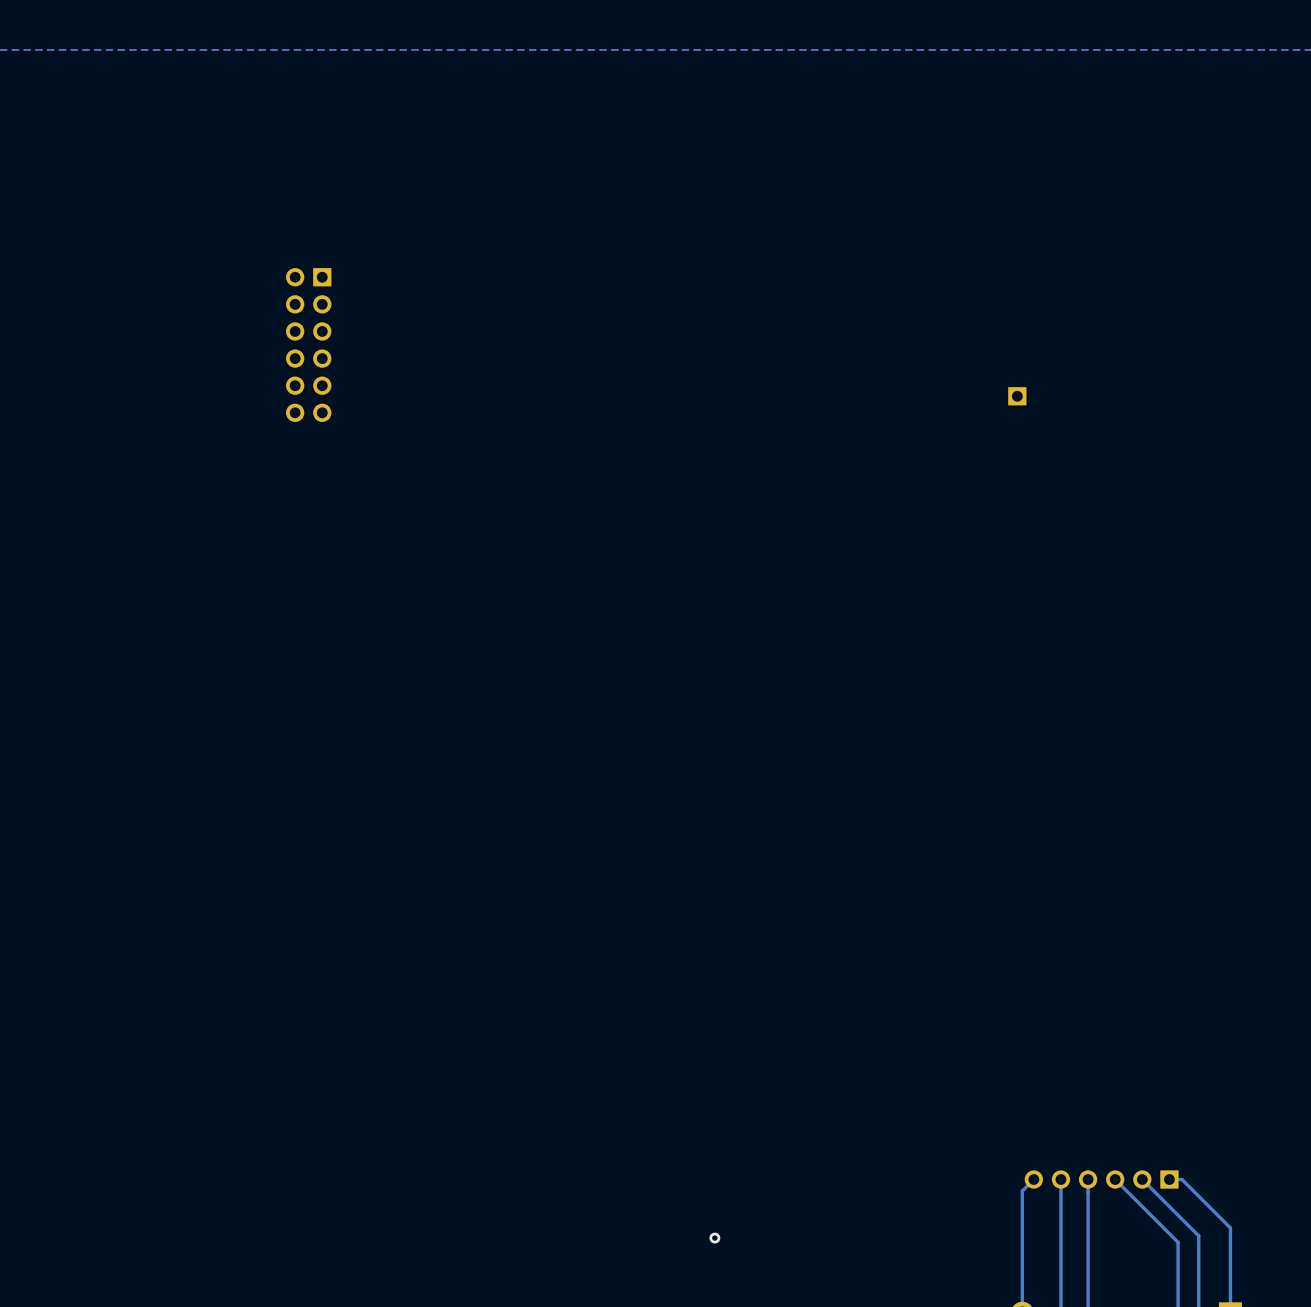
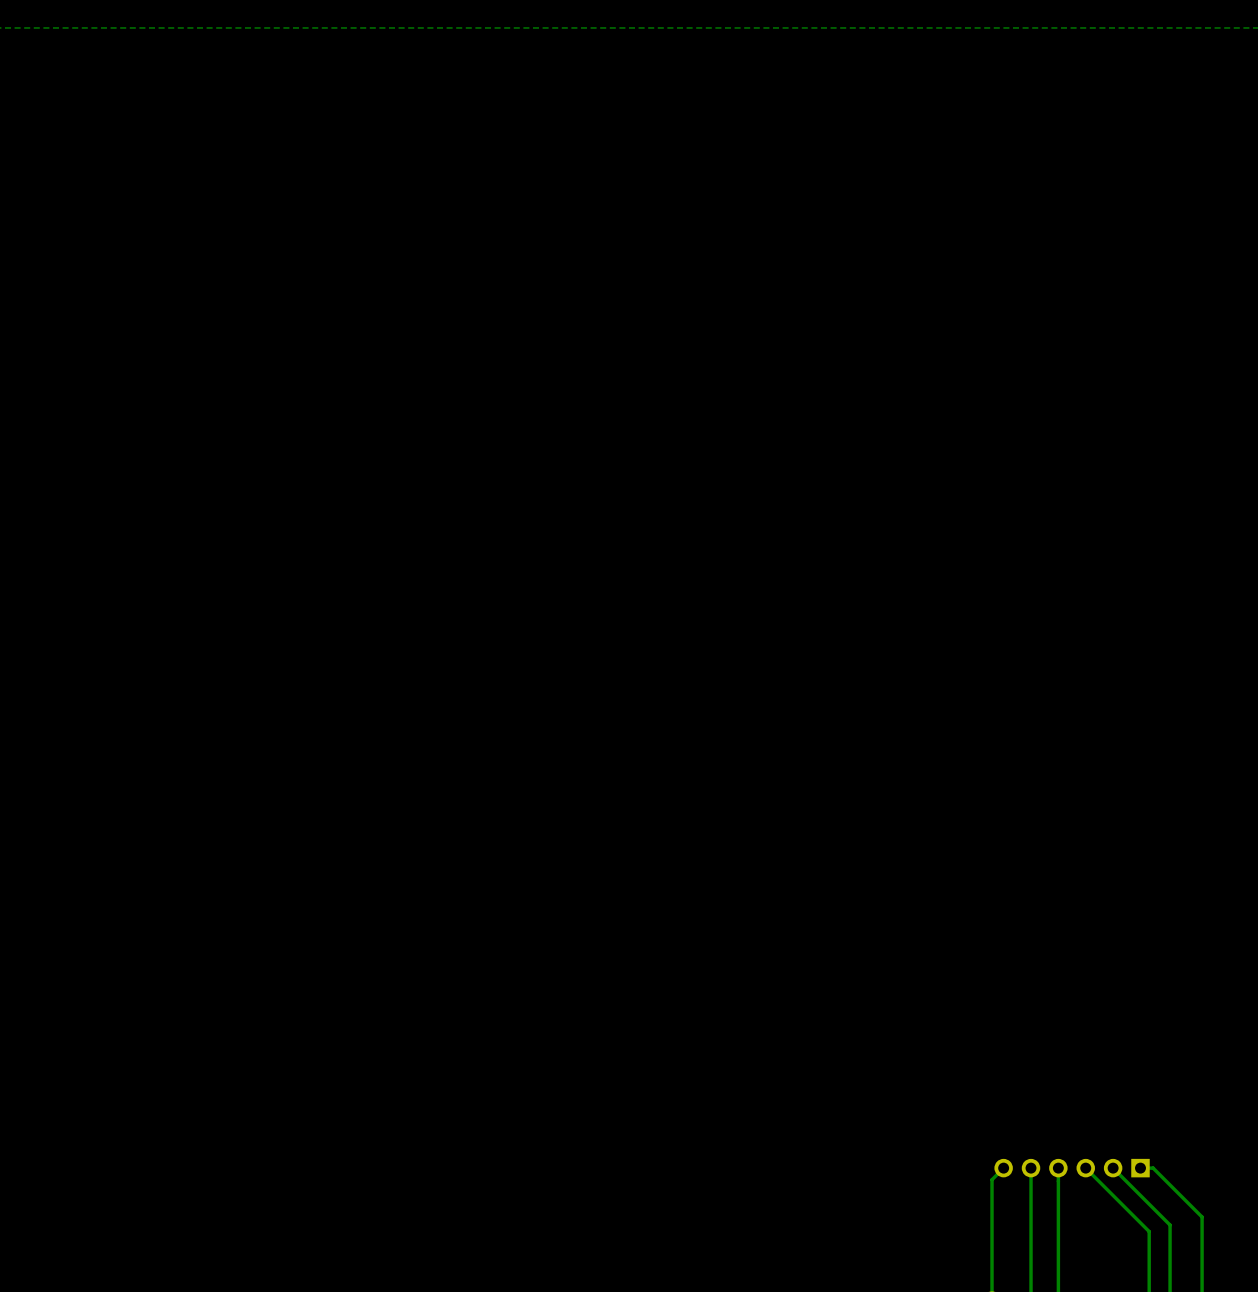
part: (308, 345) -> none
part: (1017, 396) -> none
via: (714, 1238) -> none

